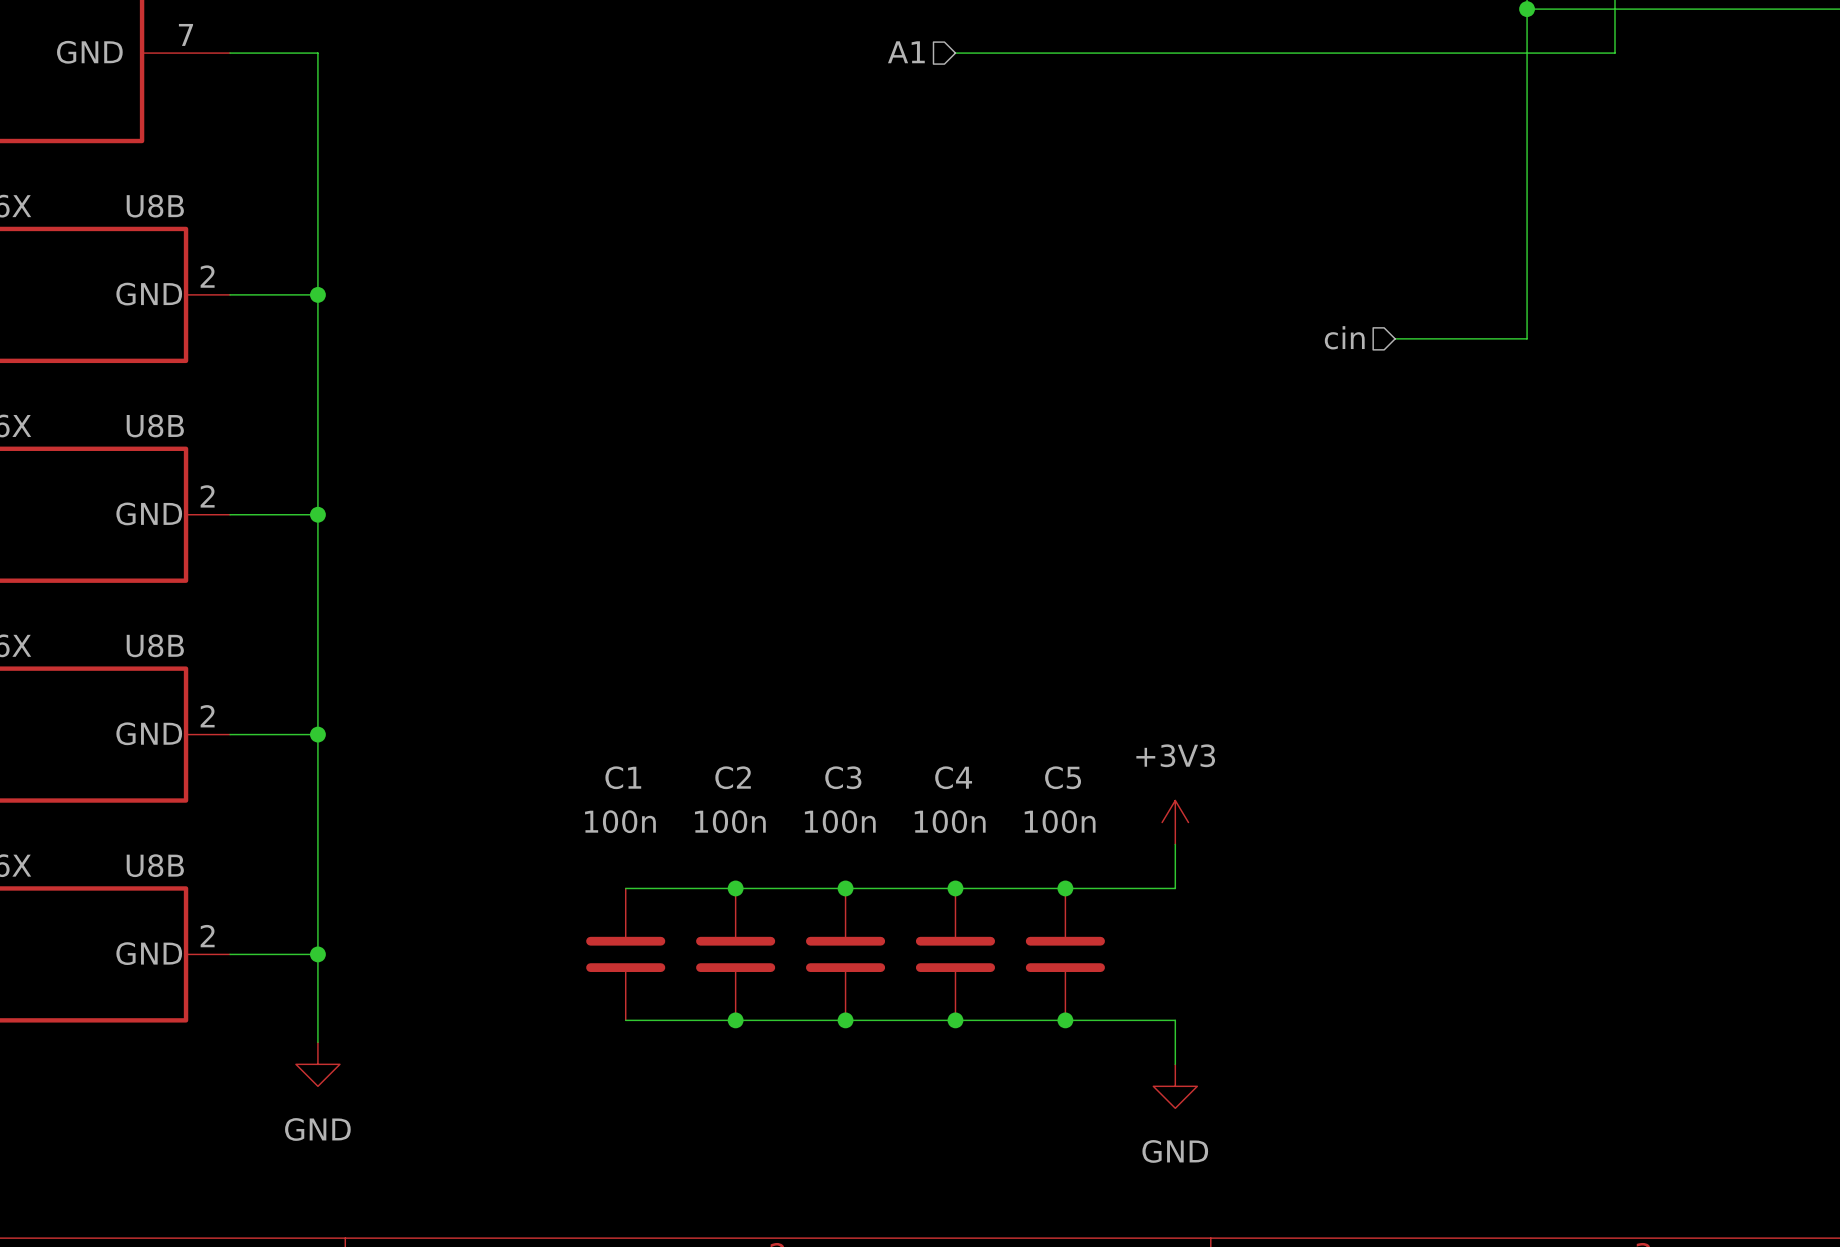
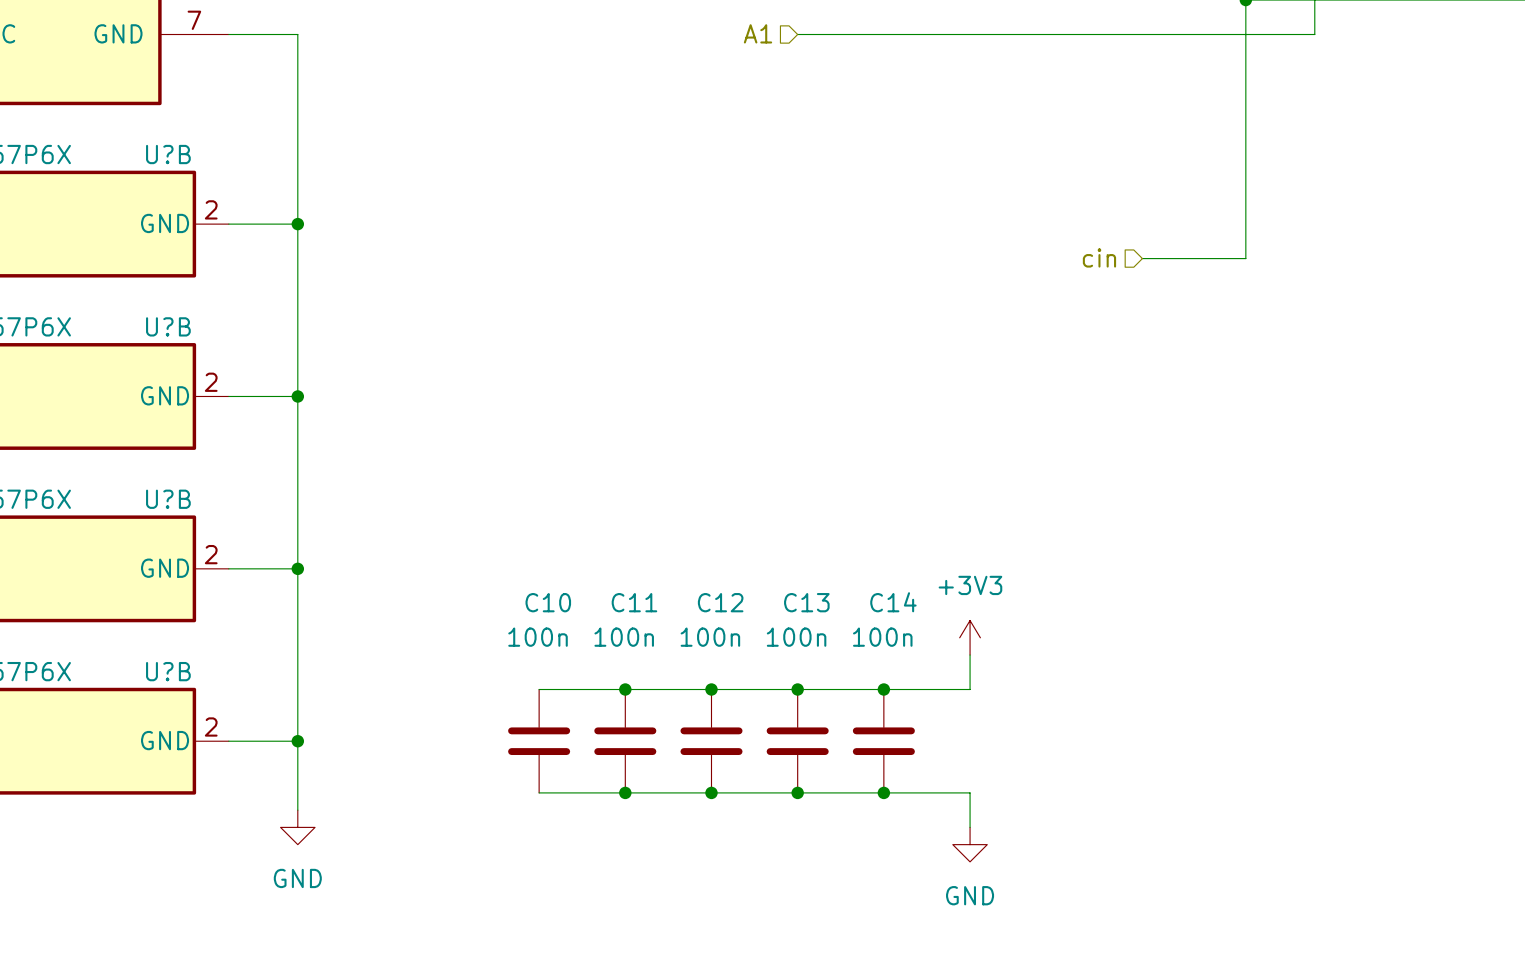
U8B name: U8B (155, 206) -> U?B (168, 154)
U8B name: U8B (155, 426) -> U?B (168, 326)
U8B name: U8B (155, 645) -> U?B (168, 499)
C1 name: C1 (623, 777) -> C10 (548, 602)
C2 name: C2 (733, 777) -> C11 (634, 602)
C3 name: C3 (843, 777) -> C12 (720, 602)
C4 name: C4 (953, 777) -> C13 (806, 602)
C5 name: C5 (1063, 777) -> C14 (893, 602)
U8B name: U8B (155, 865) -> U?B (168, 671)

